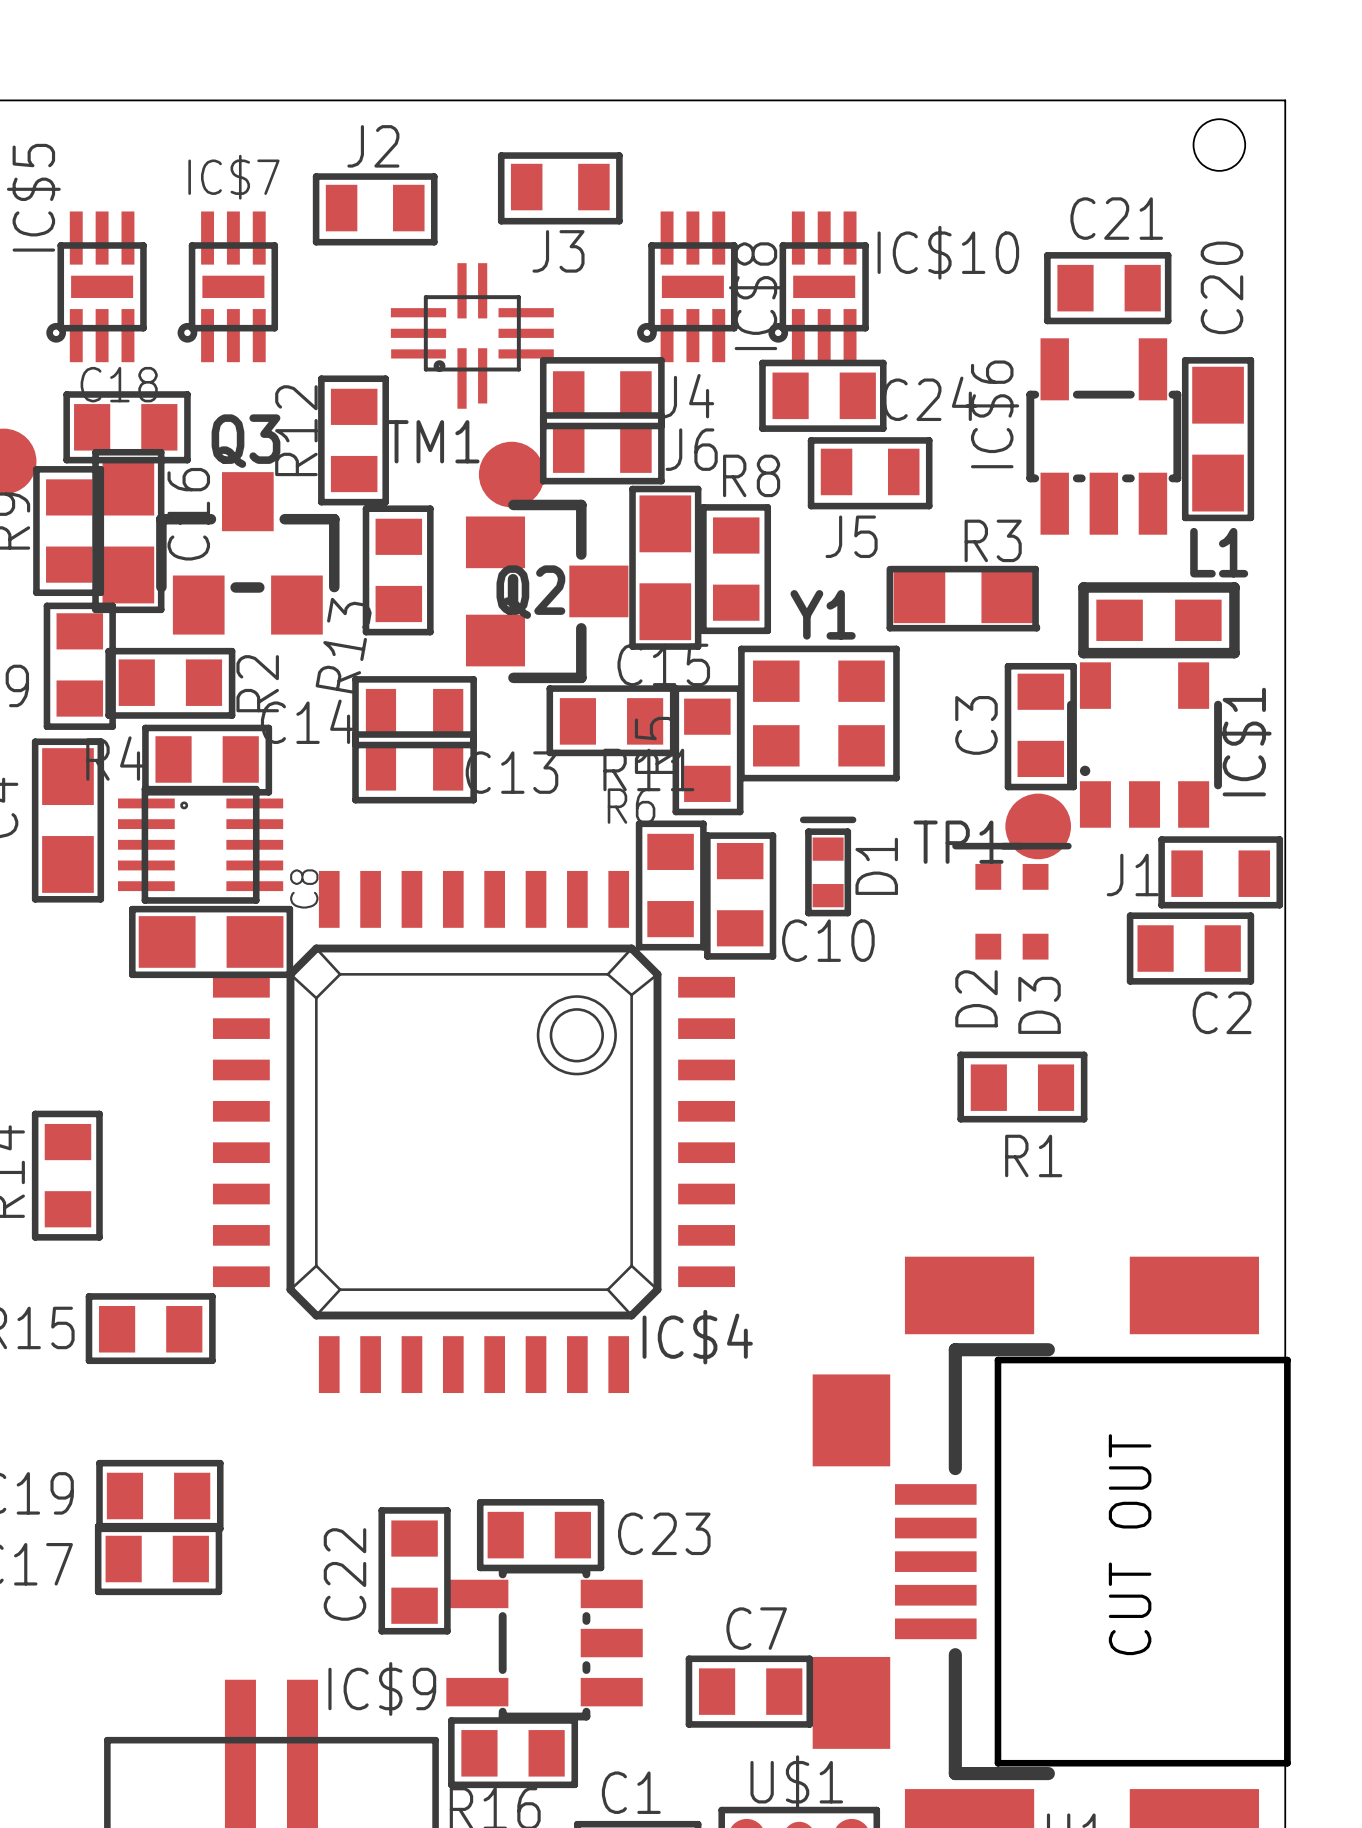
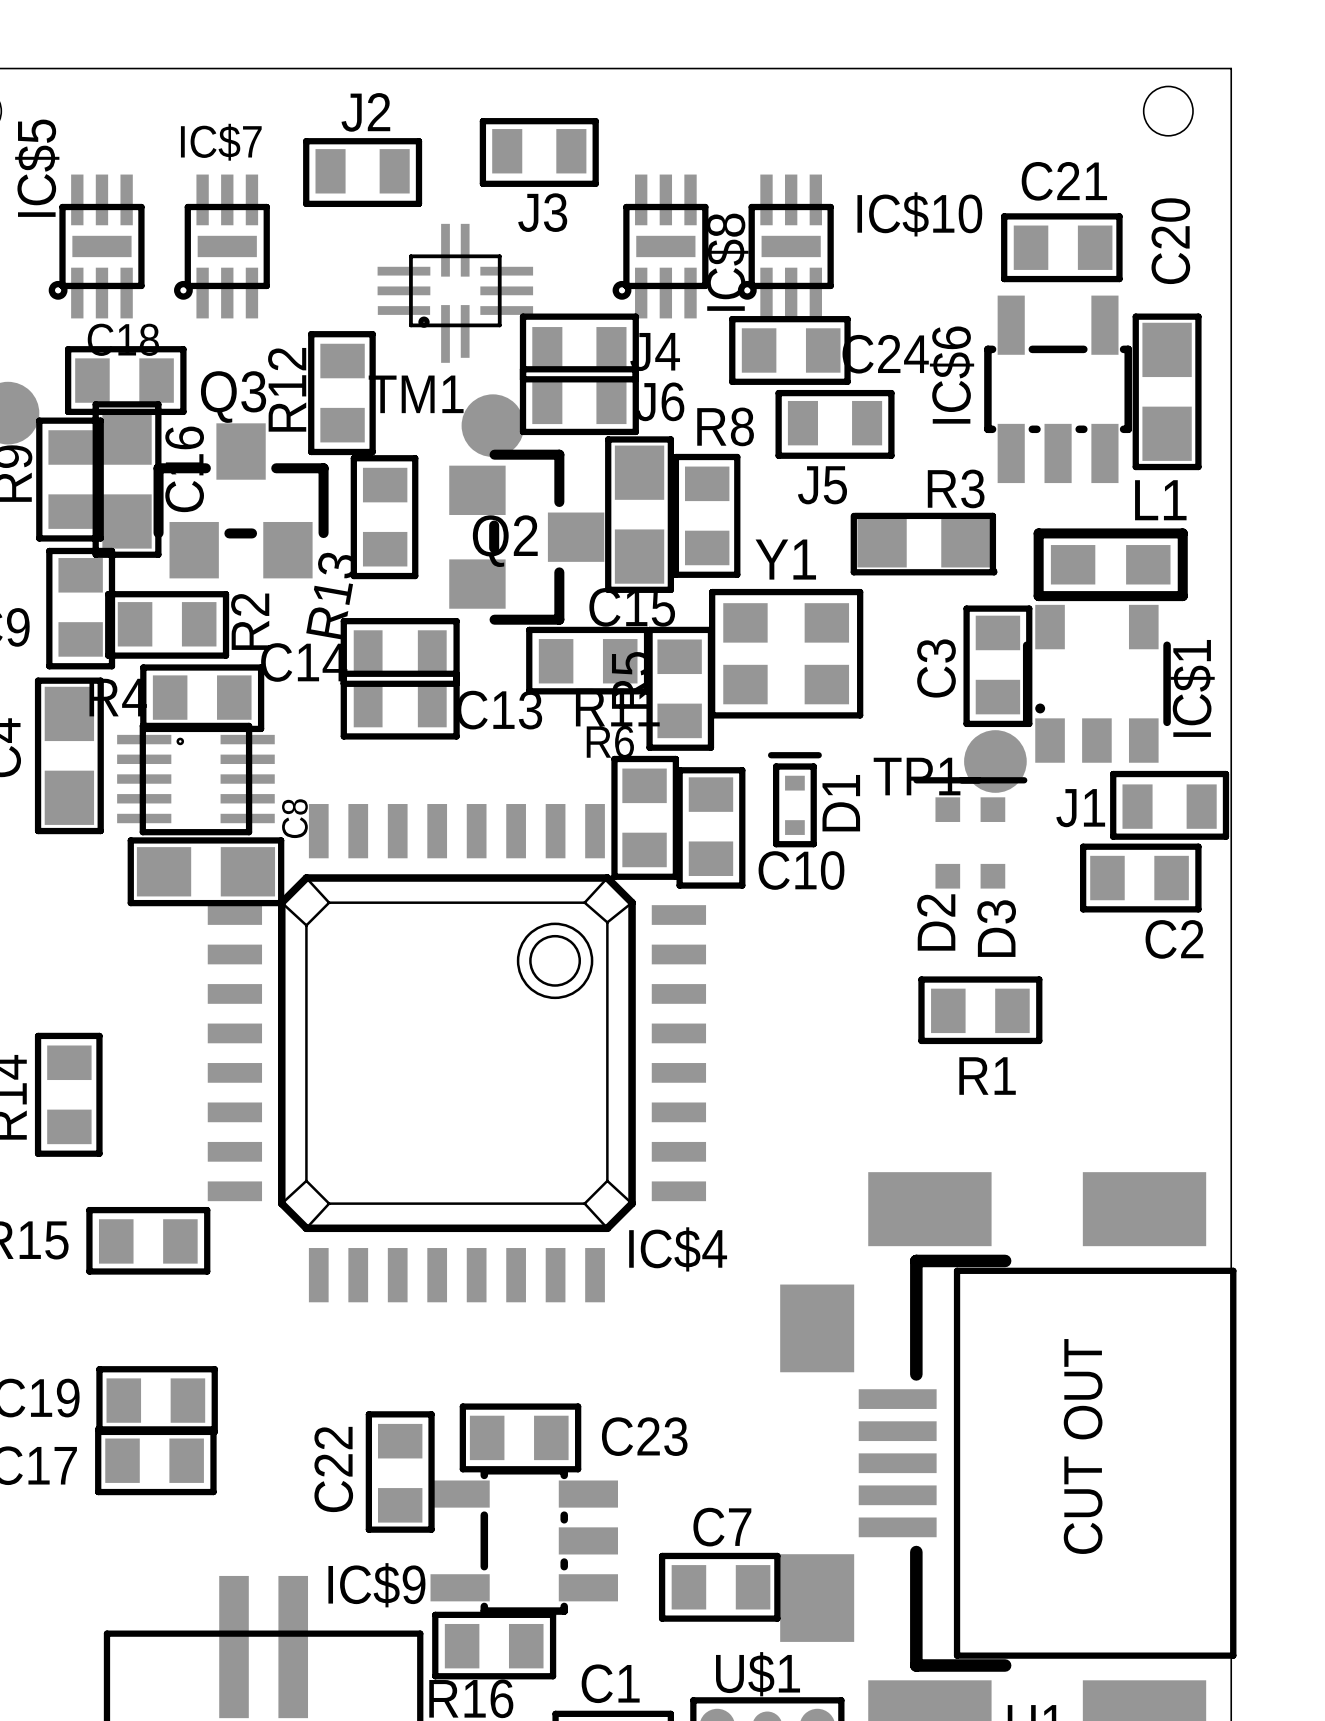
D1 footprint: [799, 816, 857, 917] -> [767, 752, 822, 848]

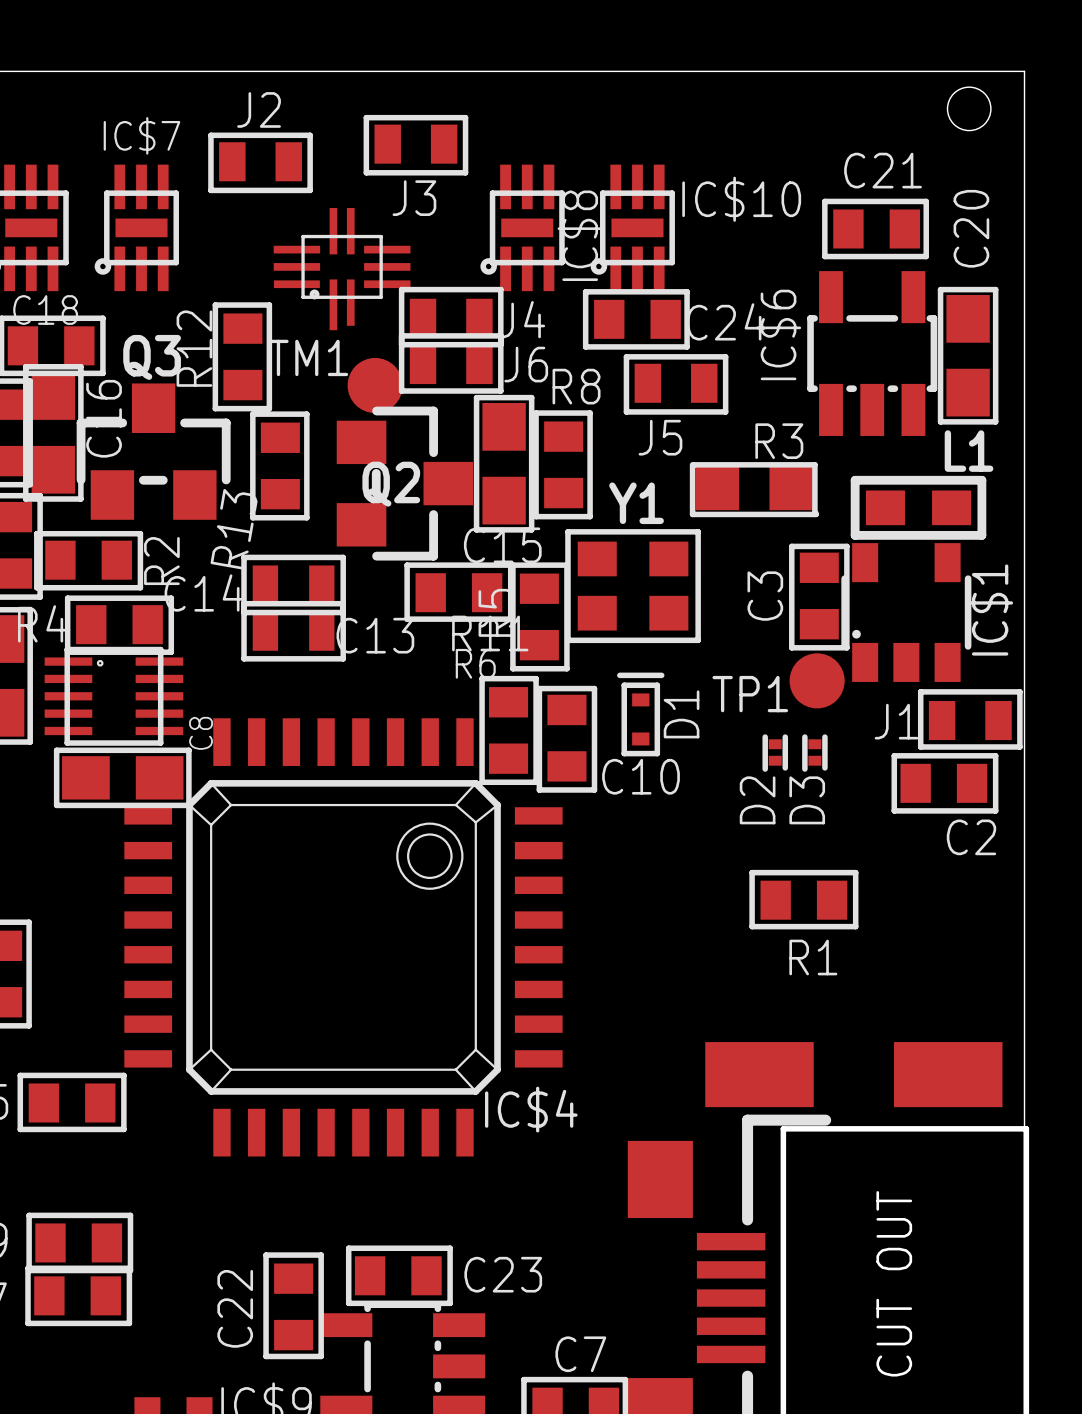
D2 footprint: [913, 777, 983, 889] -> [762, 734, 789, 772]
D3 footprint: [958, 777, 1028, 889] -> [802, 734, 828, 772]

